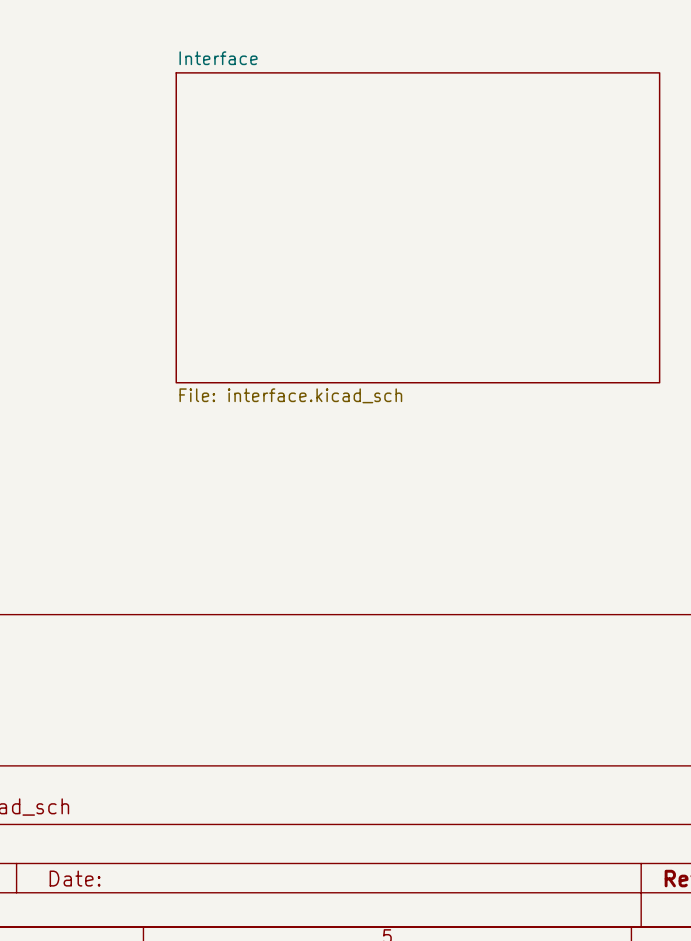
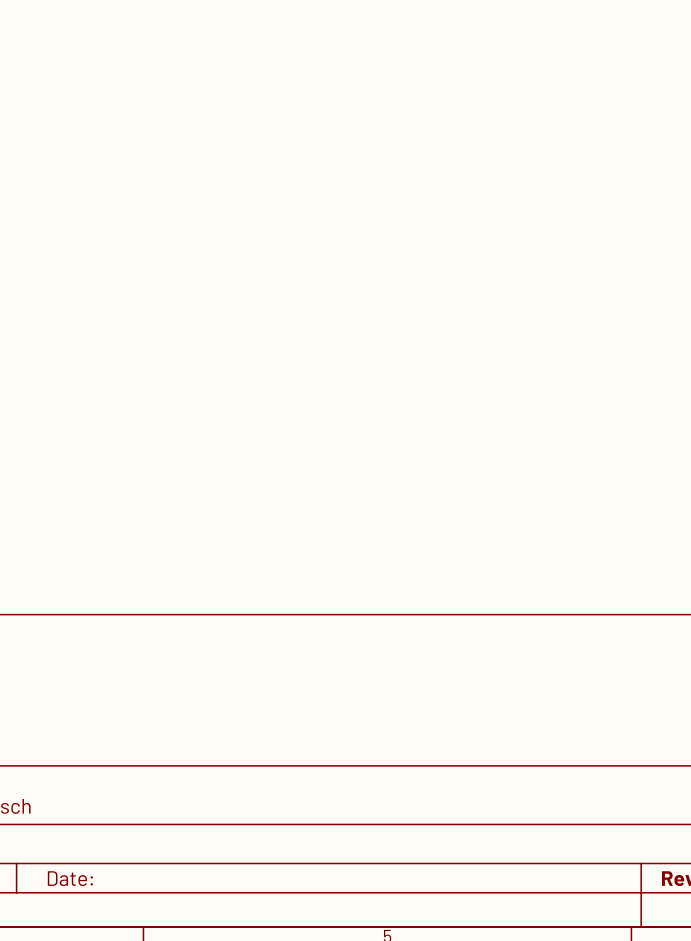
sheet Interface: File: interface.kicad_sch (417, 227) -> none

